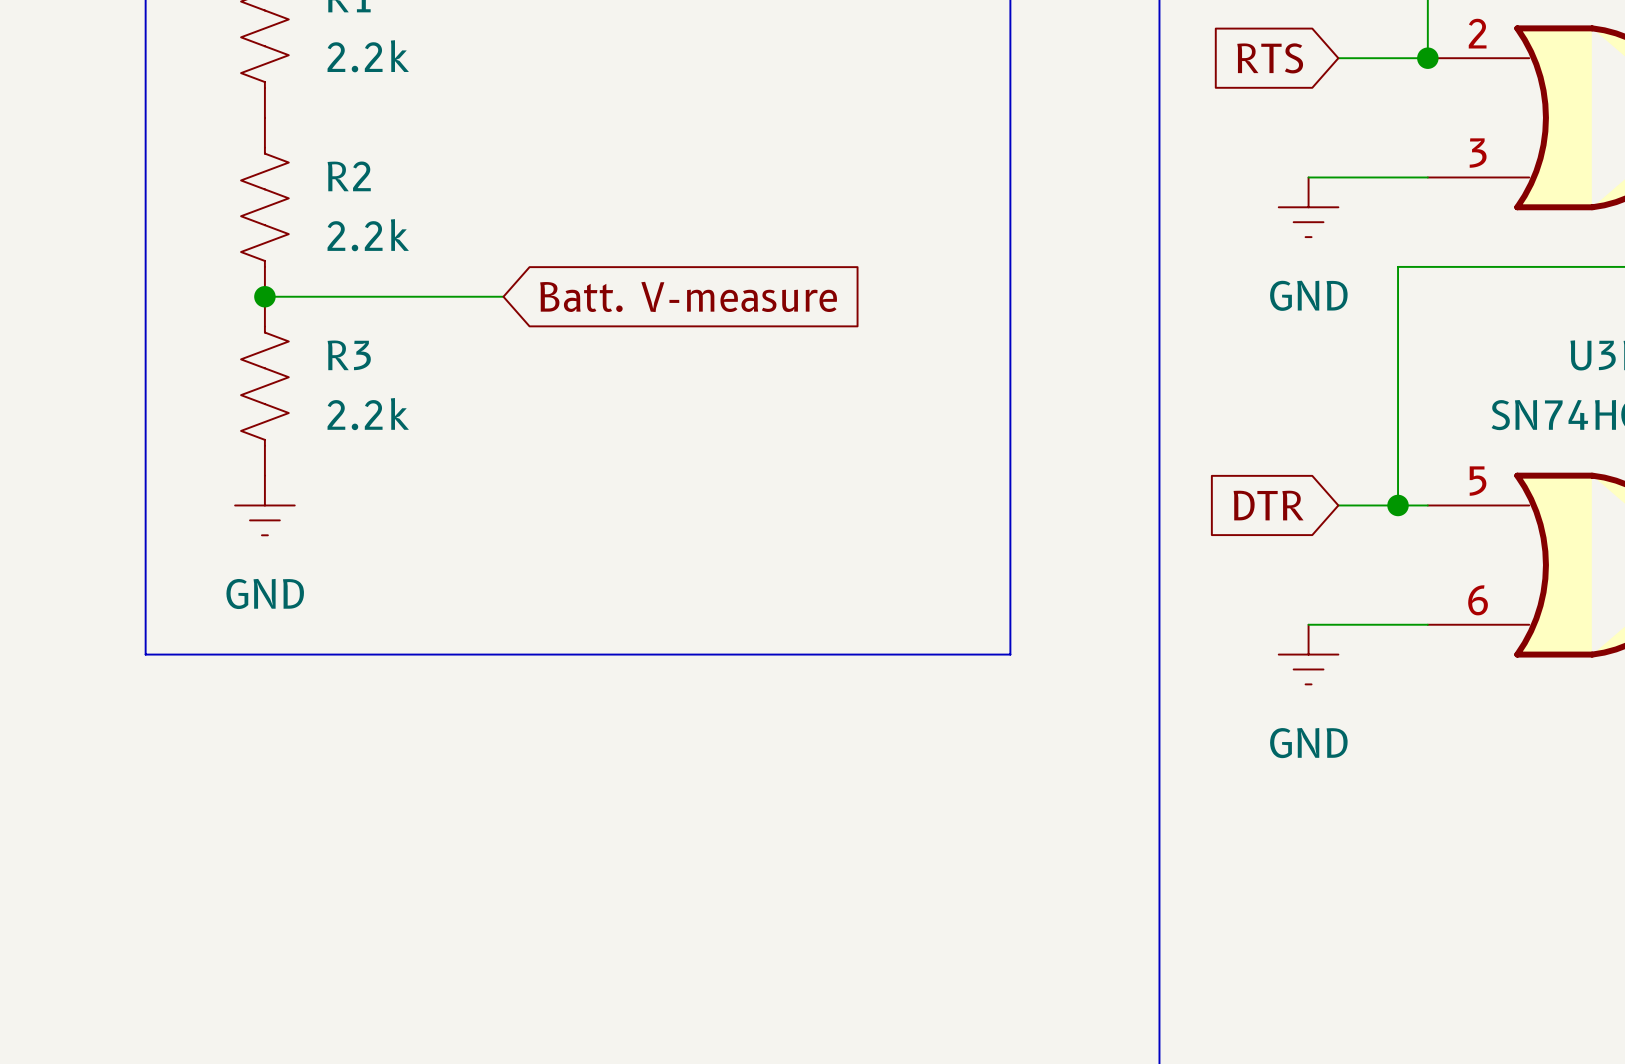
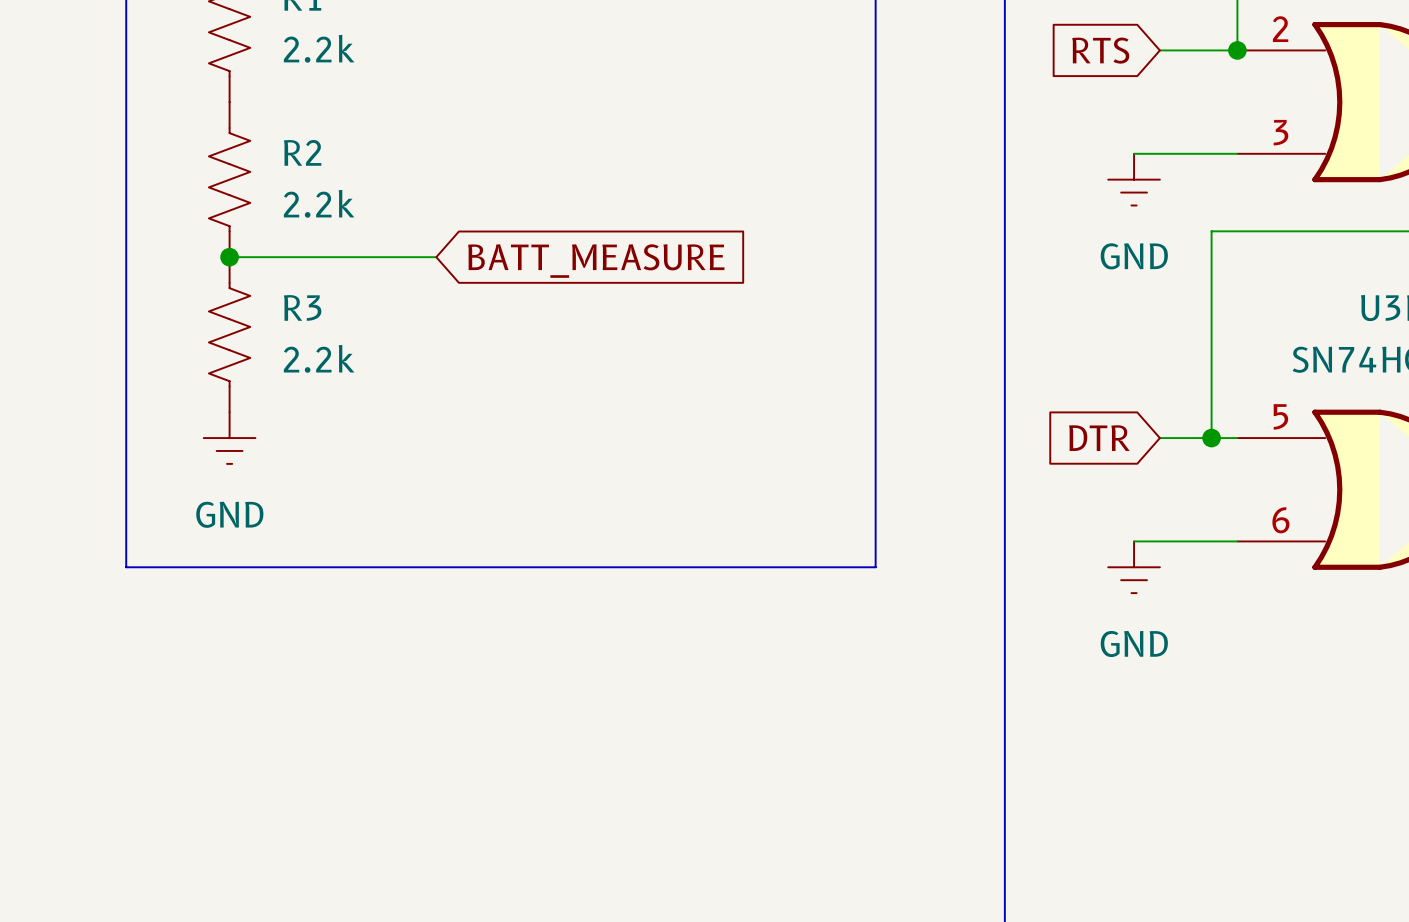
global label: Batt. V-measure (688, 296) -> BATT_MEASURE (596, 261)

